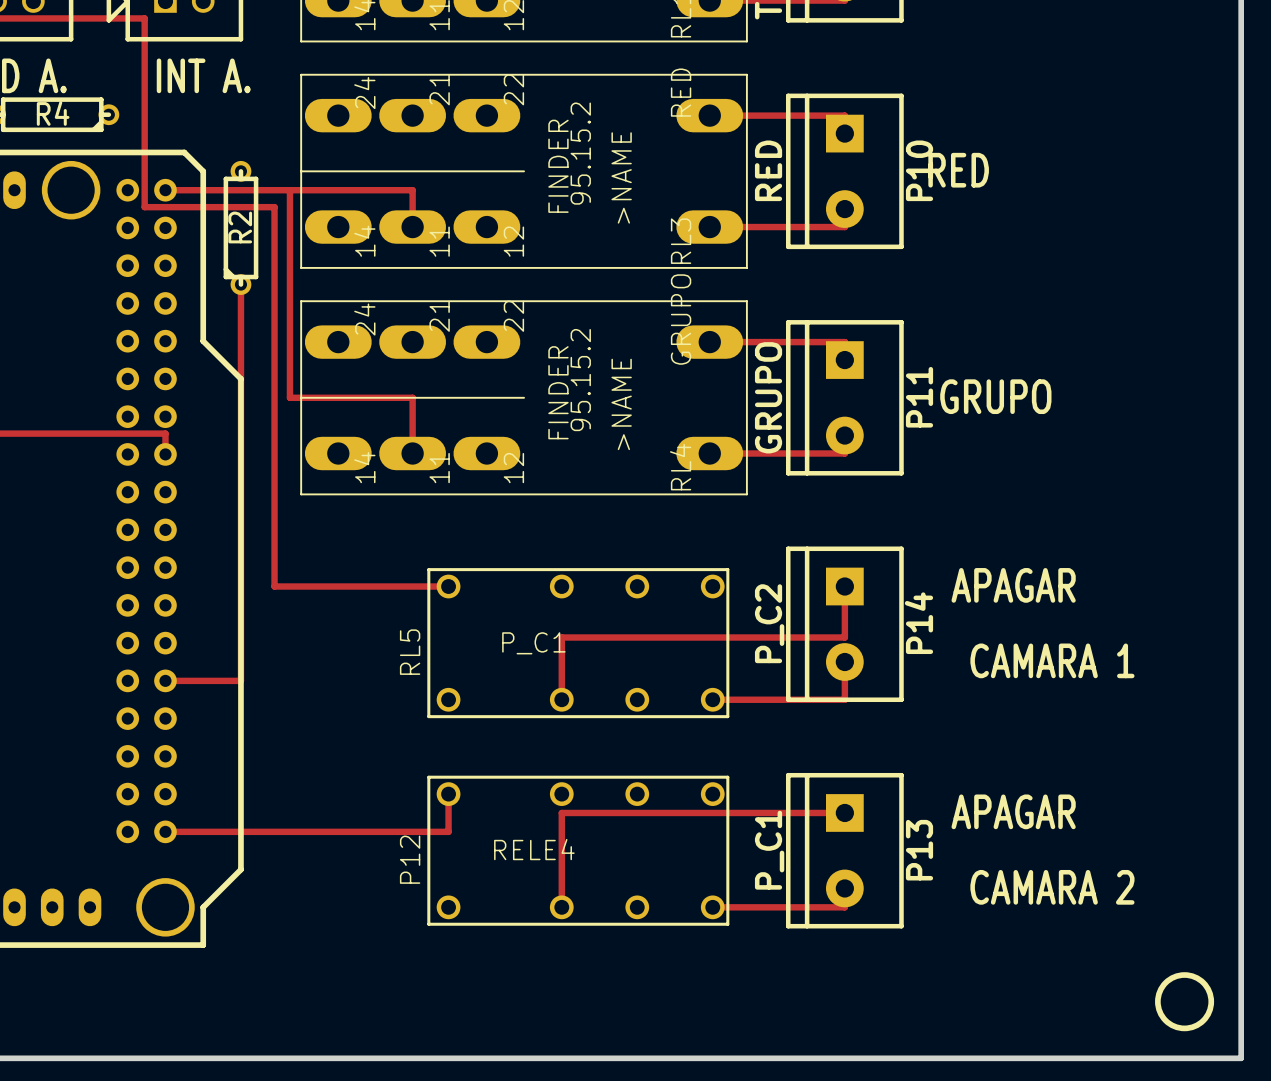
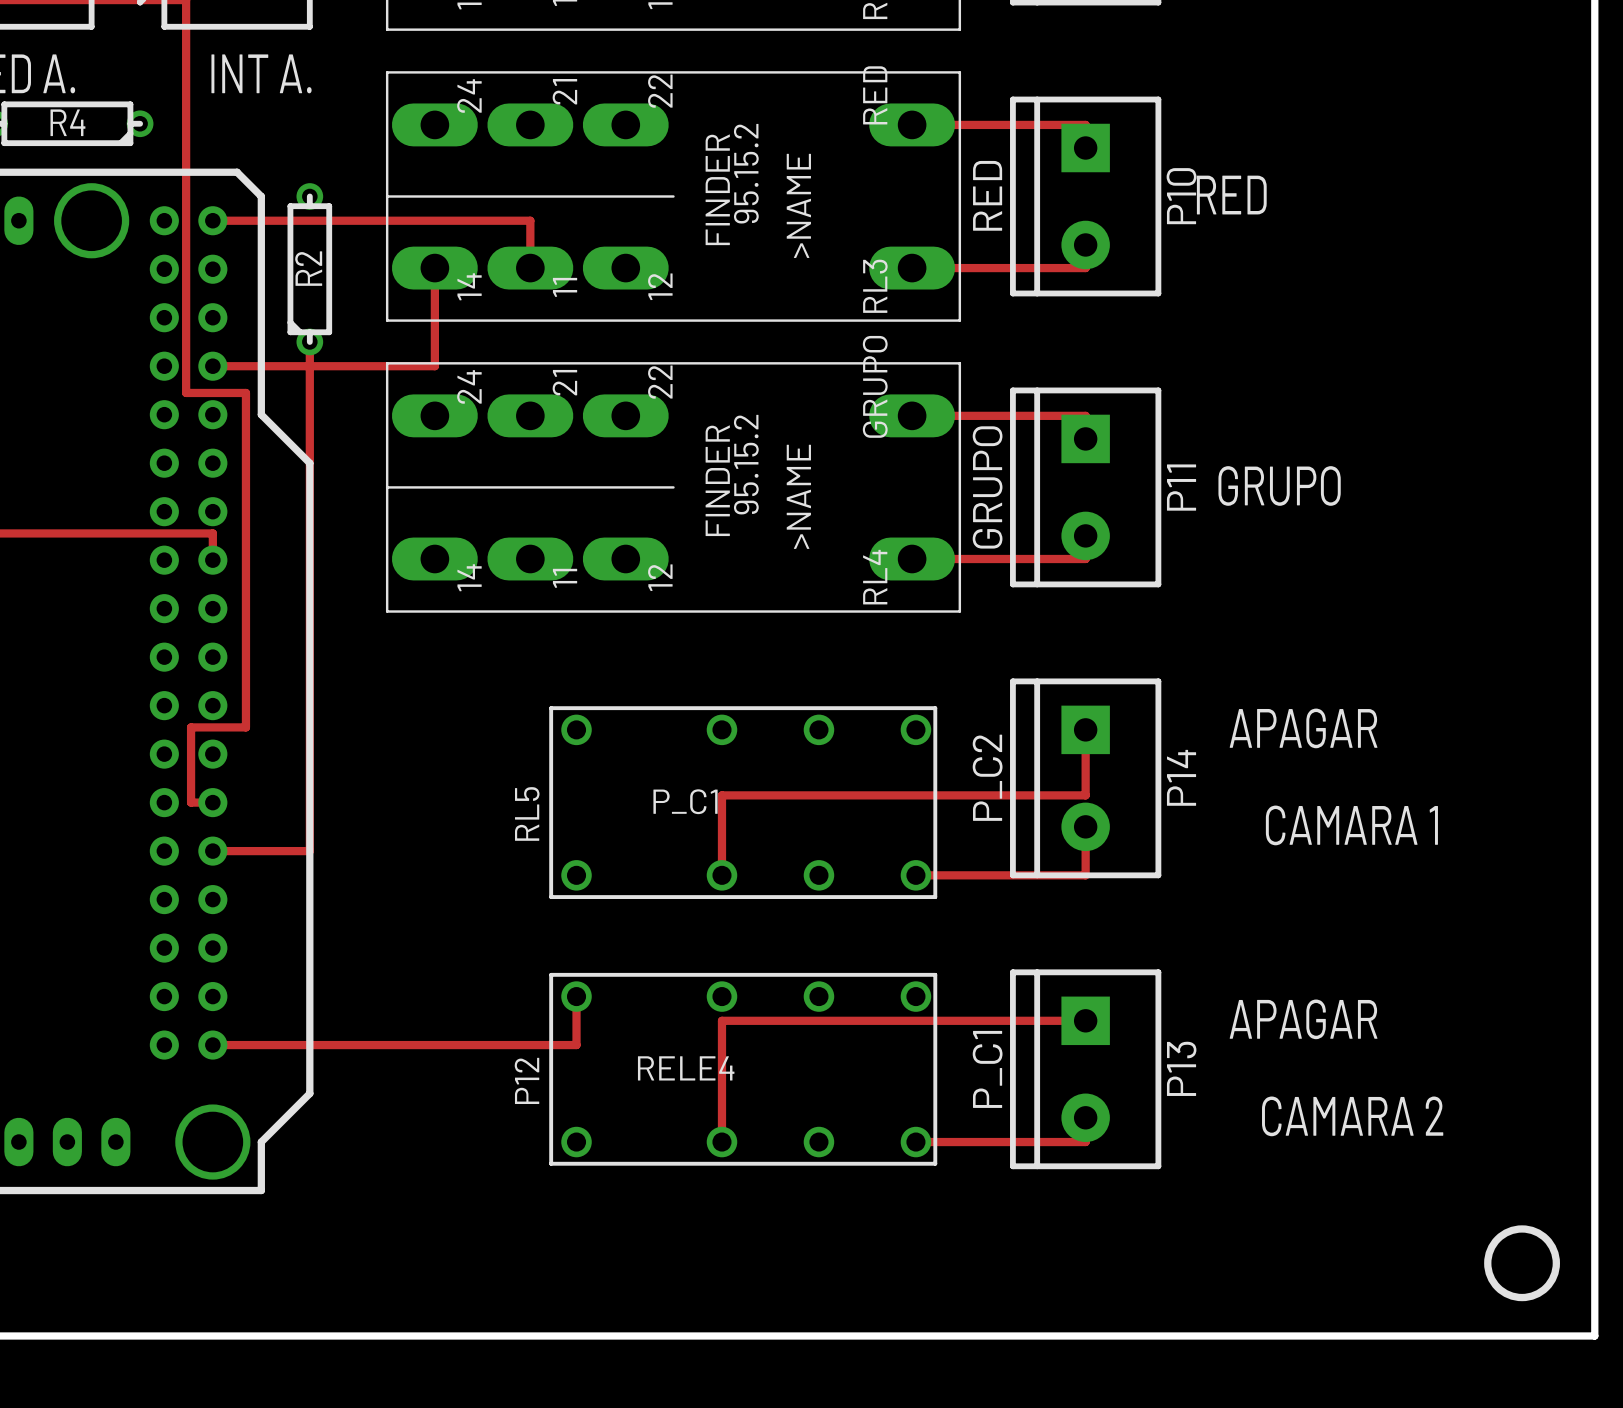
track: (289, 190) (289, 397) (412, 397) (412, 453) -> none
track: (144, 207) (274, 207) (274, 586) (448, 586) -> (186, 242) (186, 392) (245, 392) (245, 727) (191, 727) (191, 802) (212, 802)
track: none -> (434, 268) (434, 366) (212, 366)

